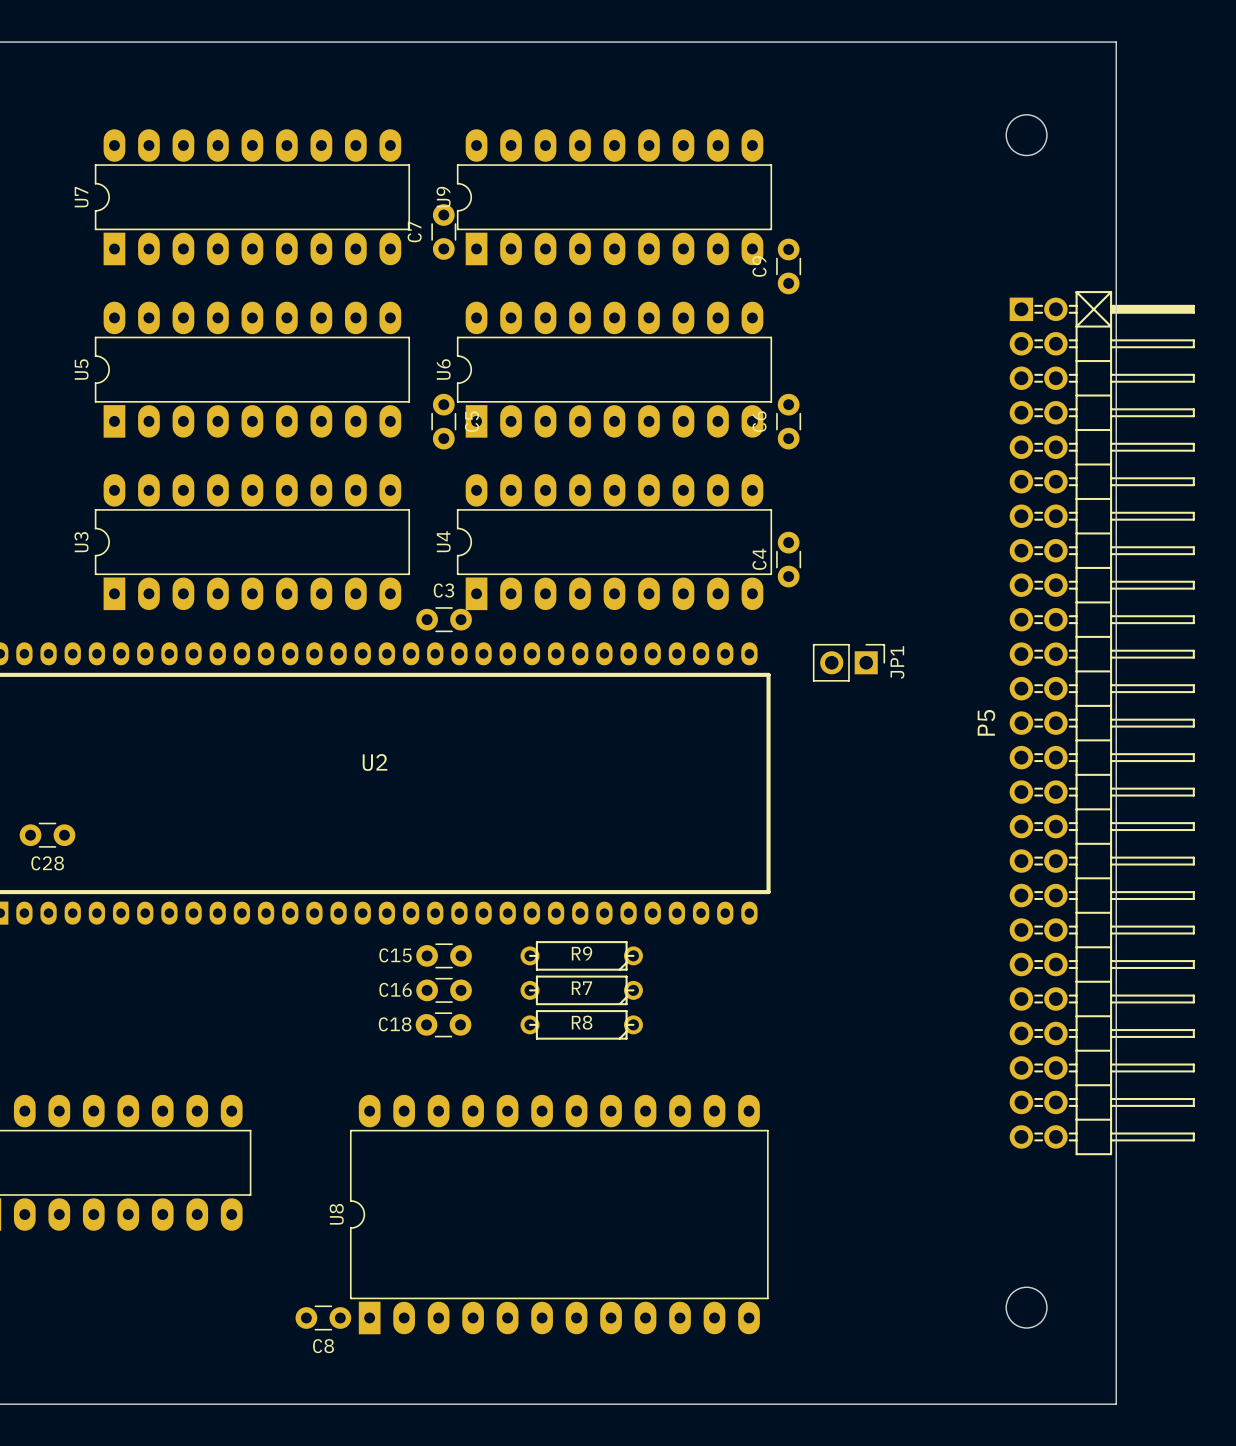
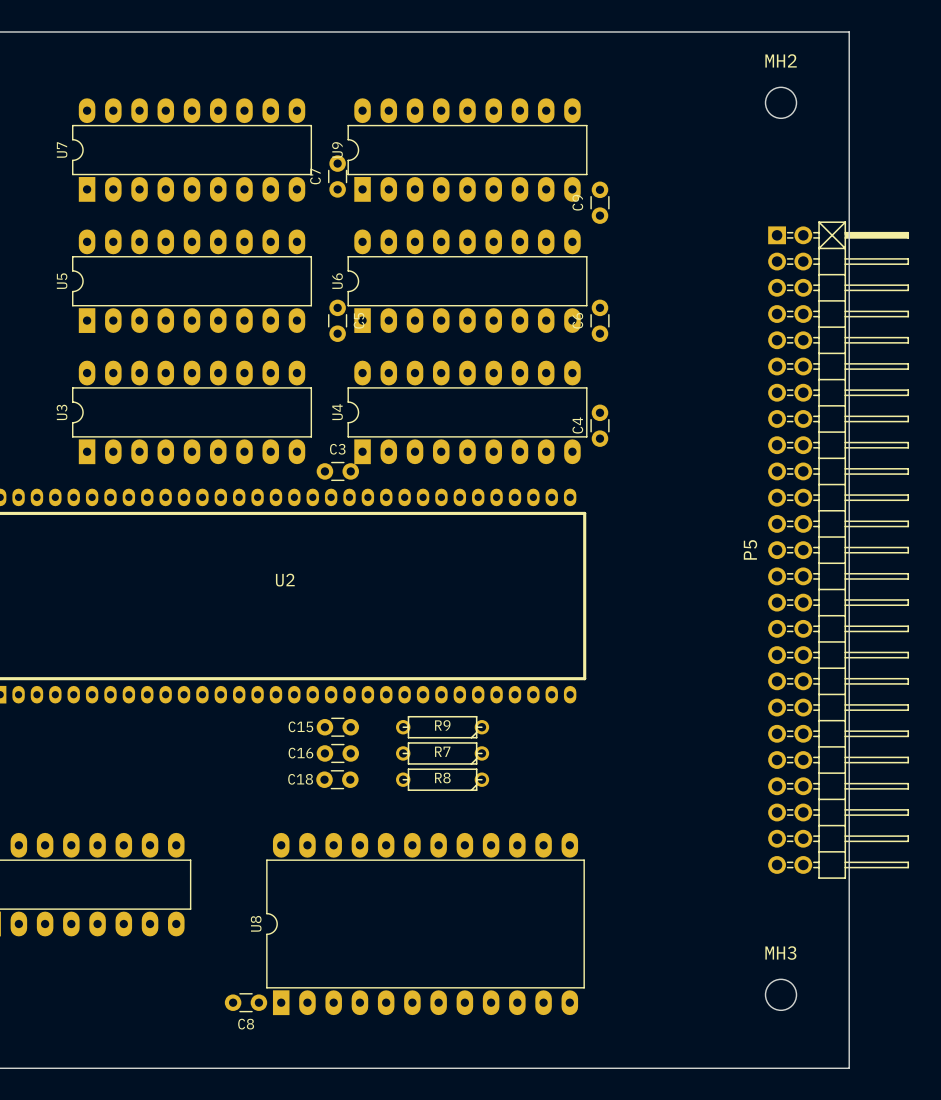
MH2 name: none -> MH2 (781, 60)
JP1: (848, 662) -> none
C28: (47, 835) -> none
MH3 name: none -> MH3 (780, 953)

